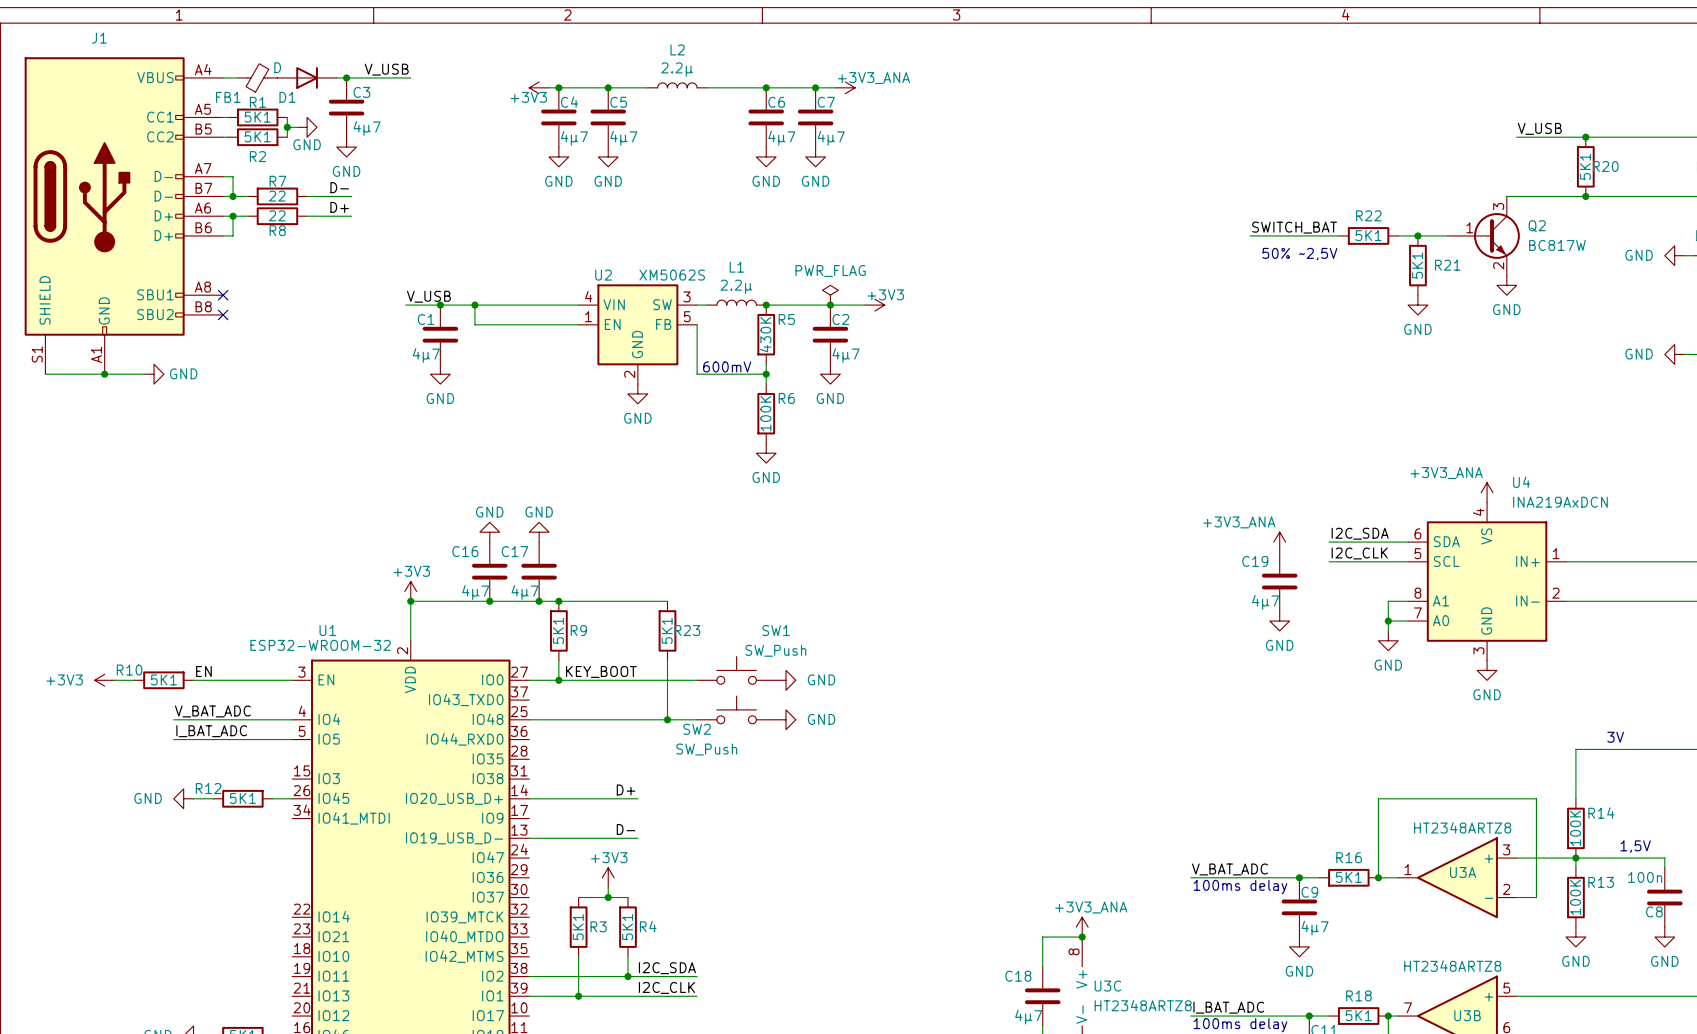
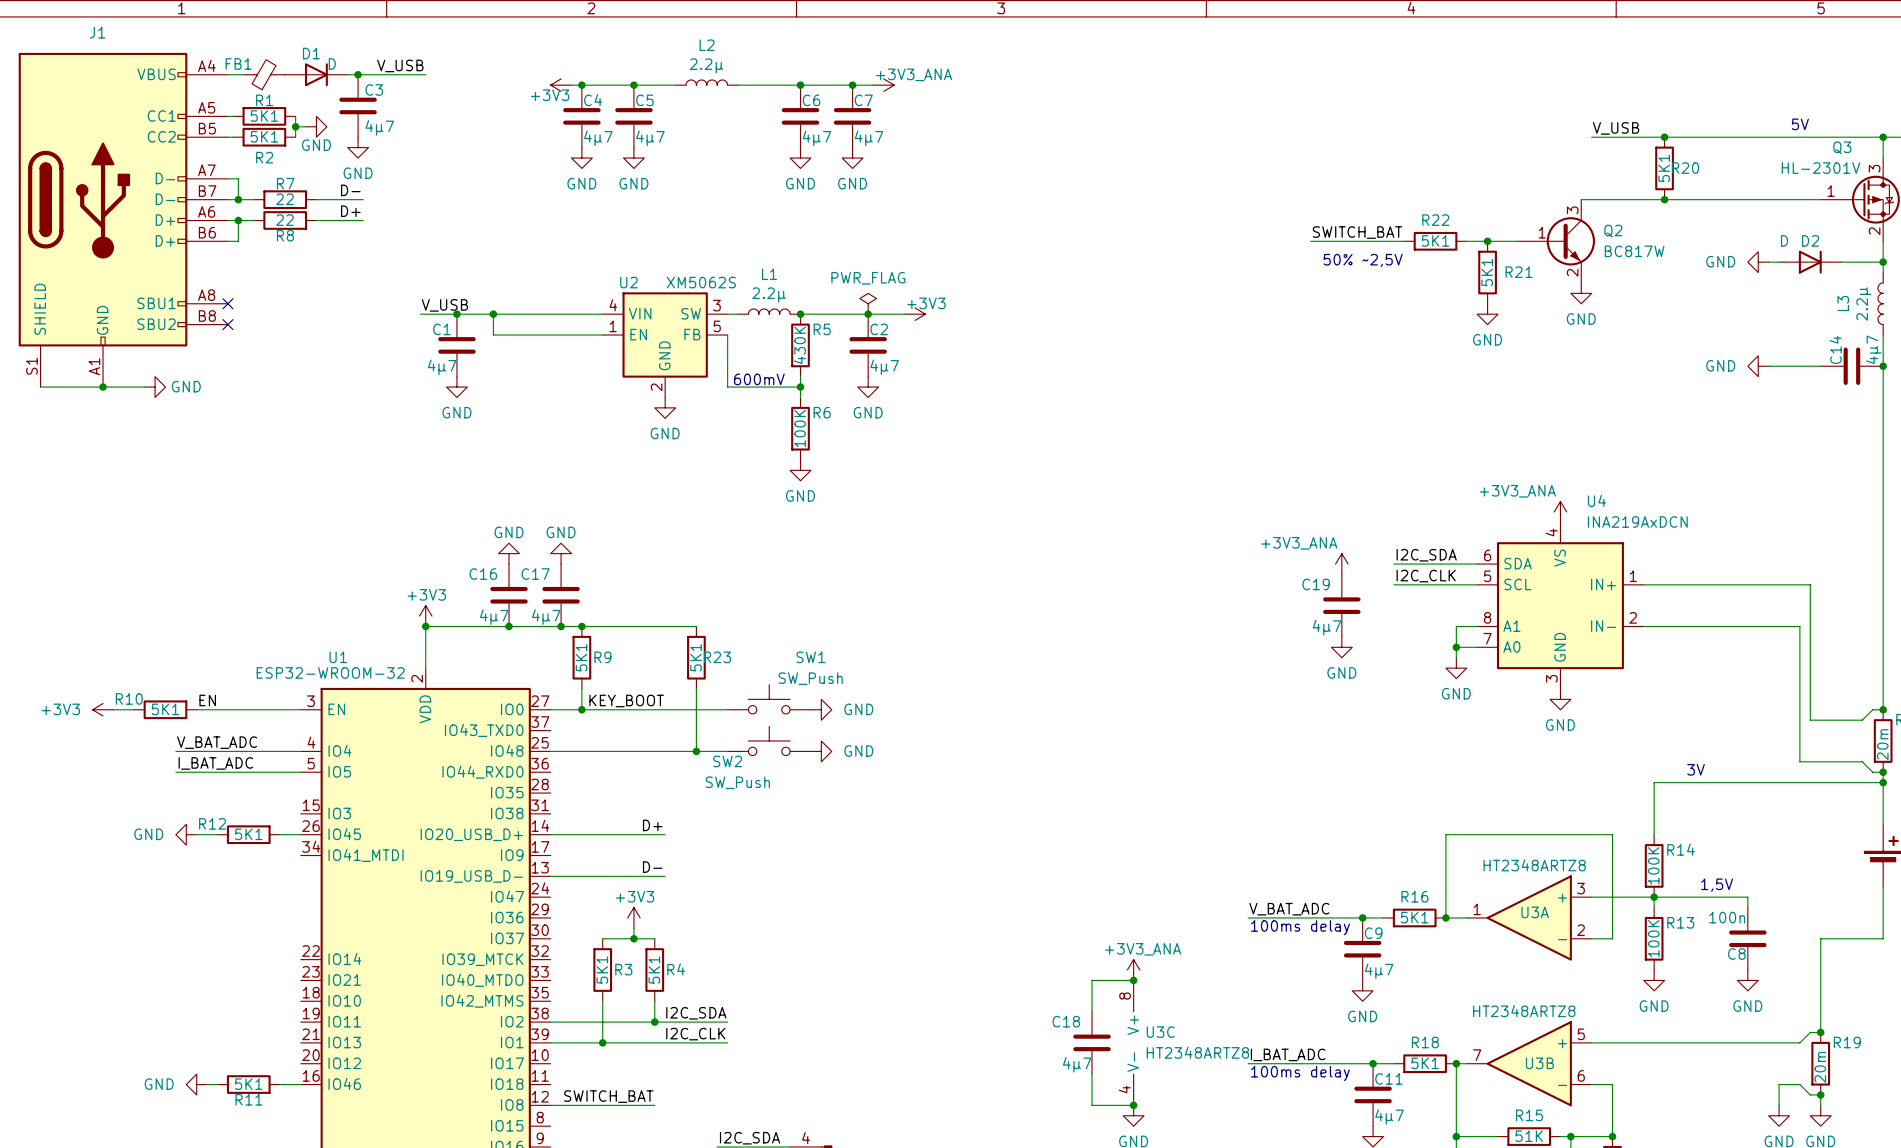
D1 value position: D (277, 67) -> D (332, 63)
FB1 name position: FB1 (228, 97) -> FB1 (238, 63)
D1 name position: D1 (287, 97) -> D1 (311, 53)

